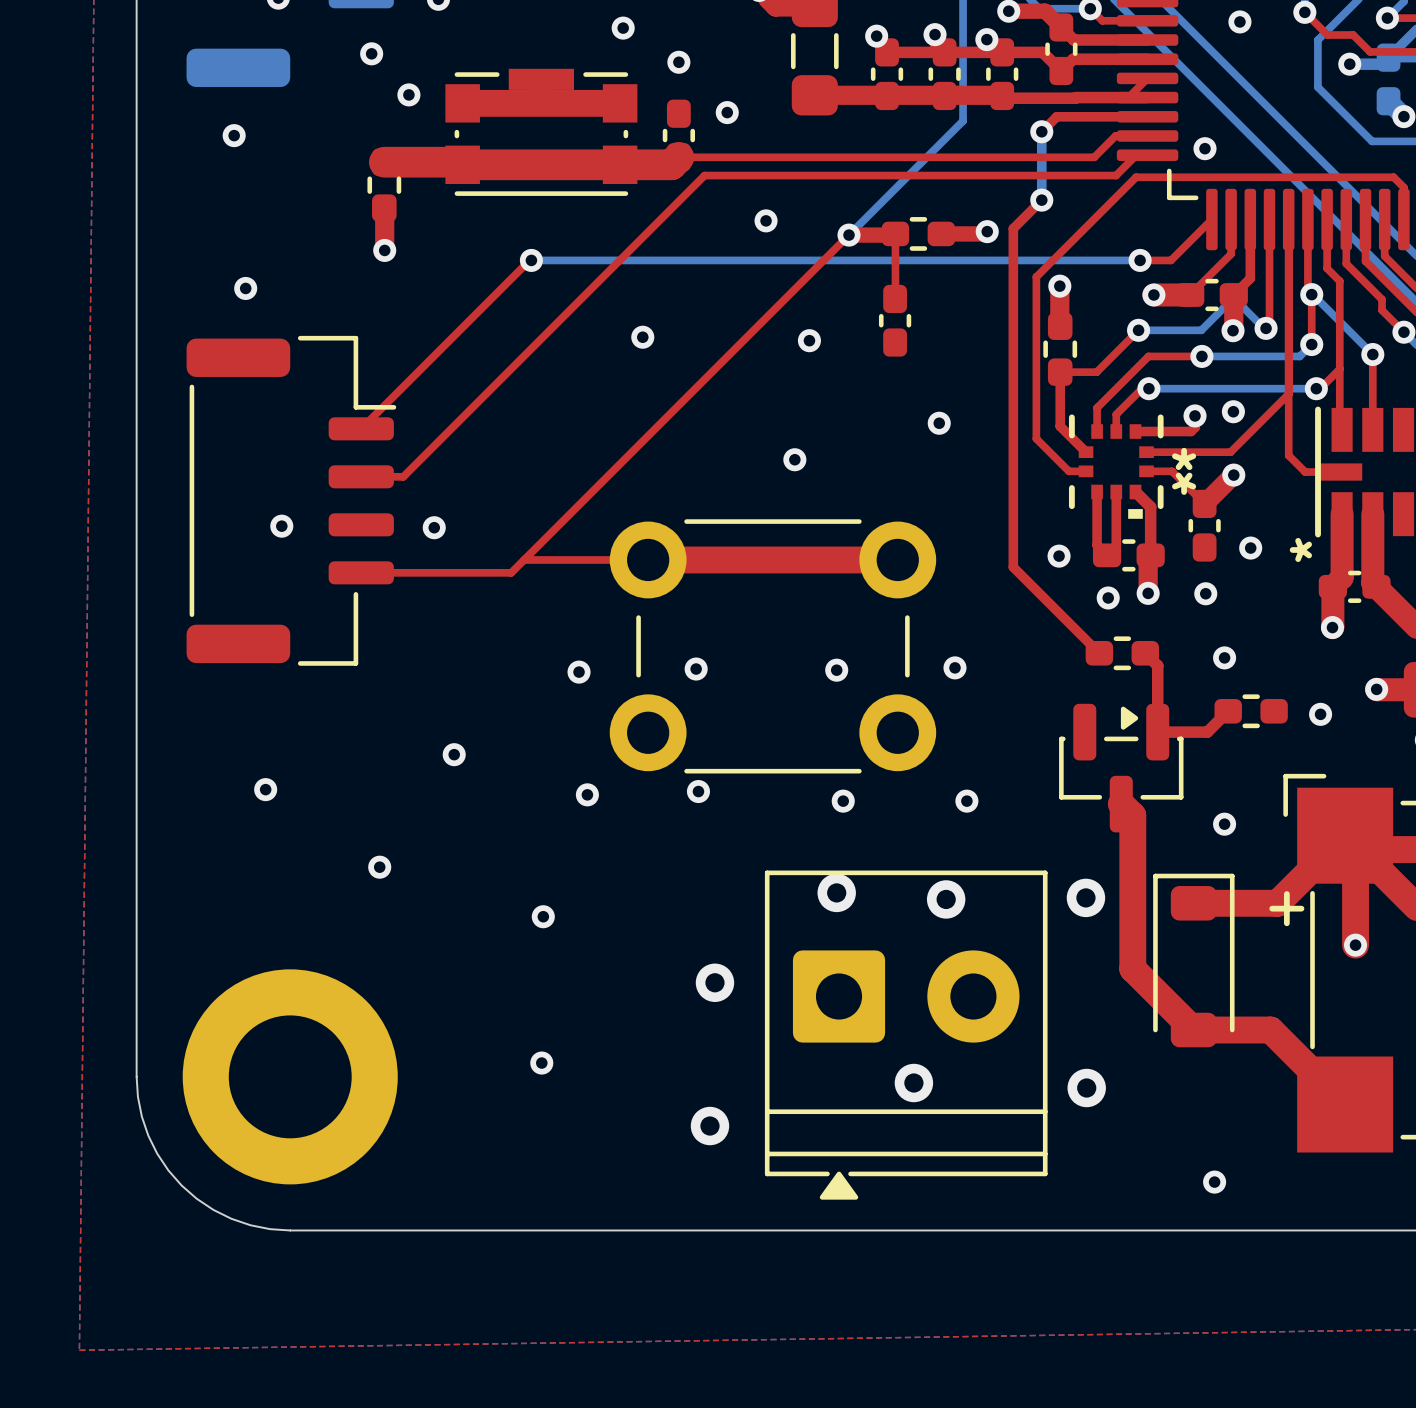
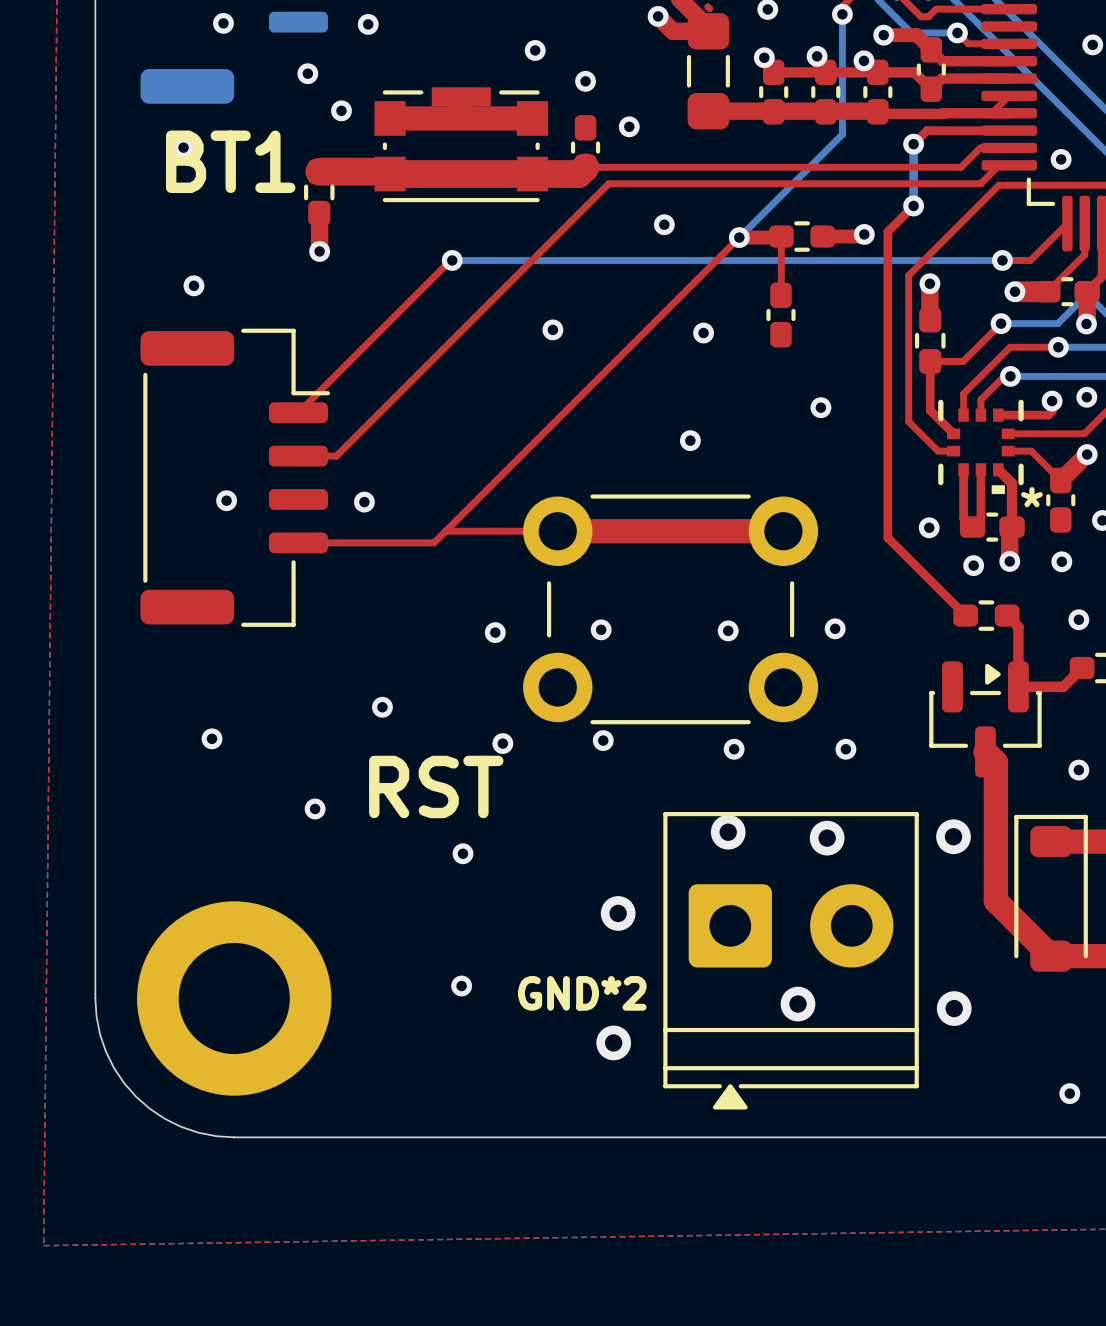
text: none -> BT1 (230, 161)
part footprint: [1068, 414, 1164, 519] -> [938, 399, 1024, 495]
text: none -> RST (436, 786)
text: none -> GND*2 (582, 993)

